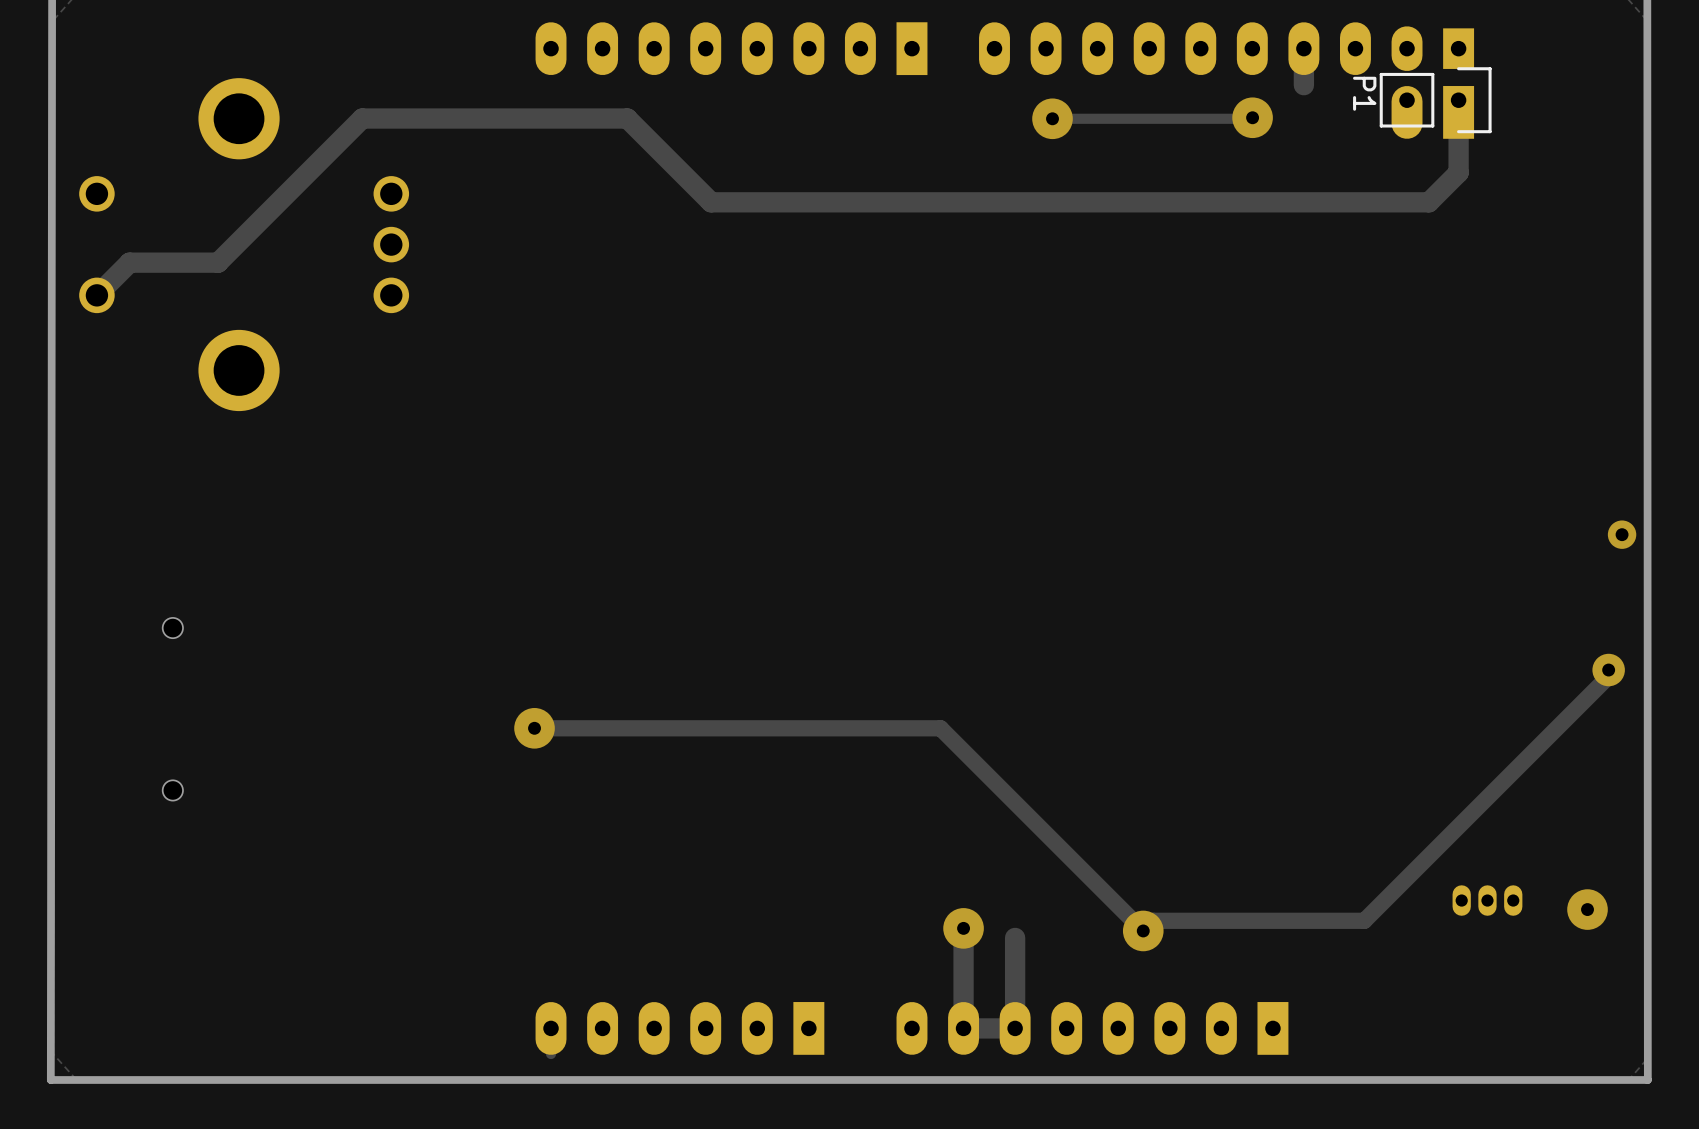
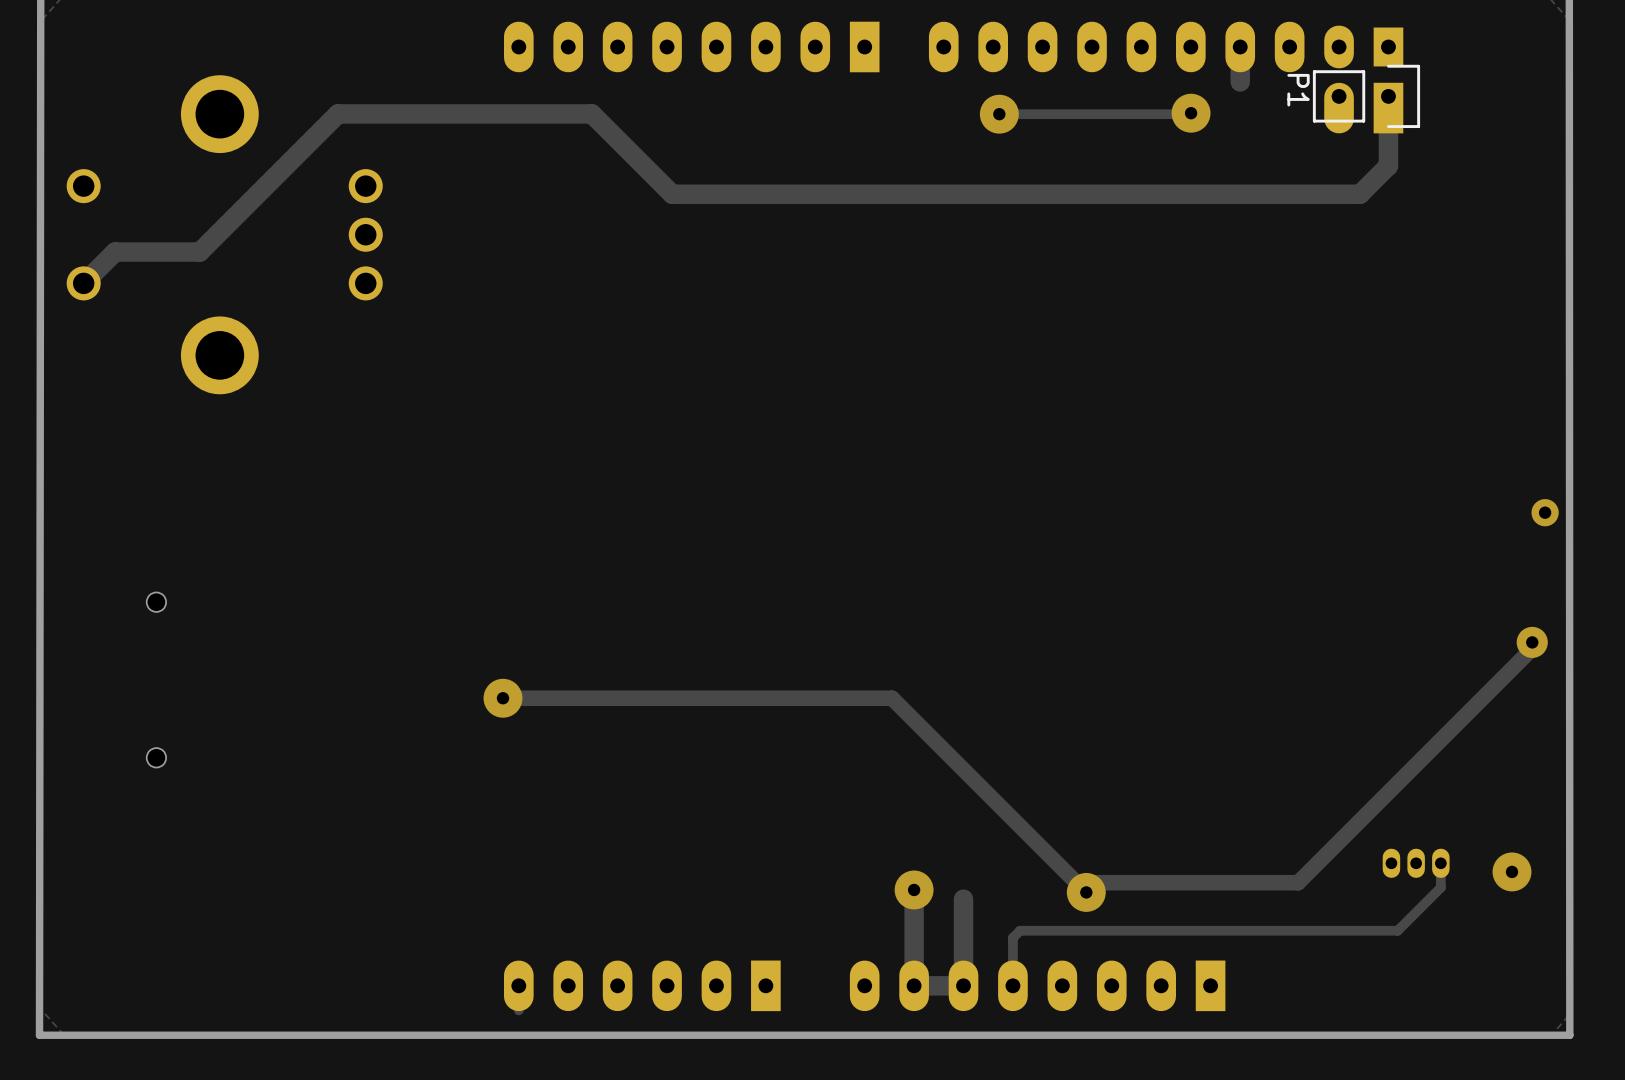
track: none -> (1440, 863) (1440, 887) (1397, 930) (1020, 930) (1012, 937) (1012, 985)

